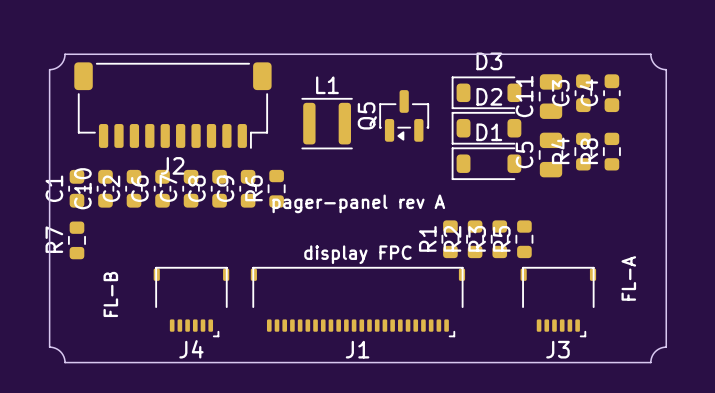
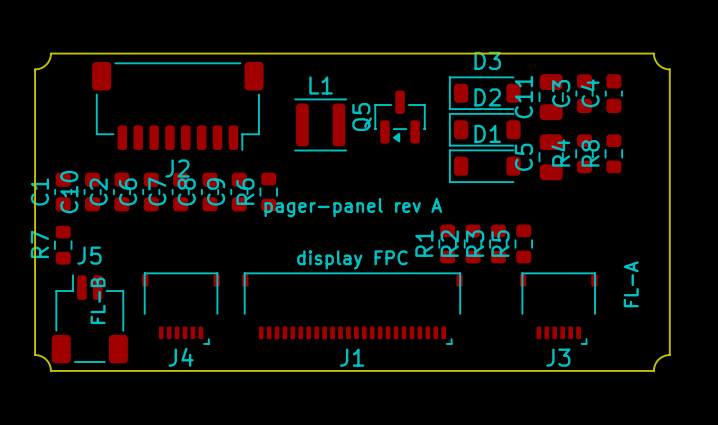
J2 footprint: [74, 62, 272, 149] -> [92, 61, 264, 151]
J5: none -> (89, 318)

